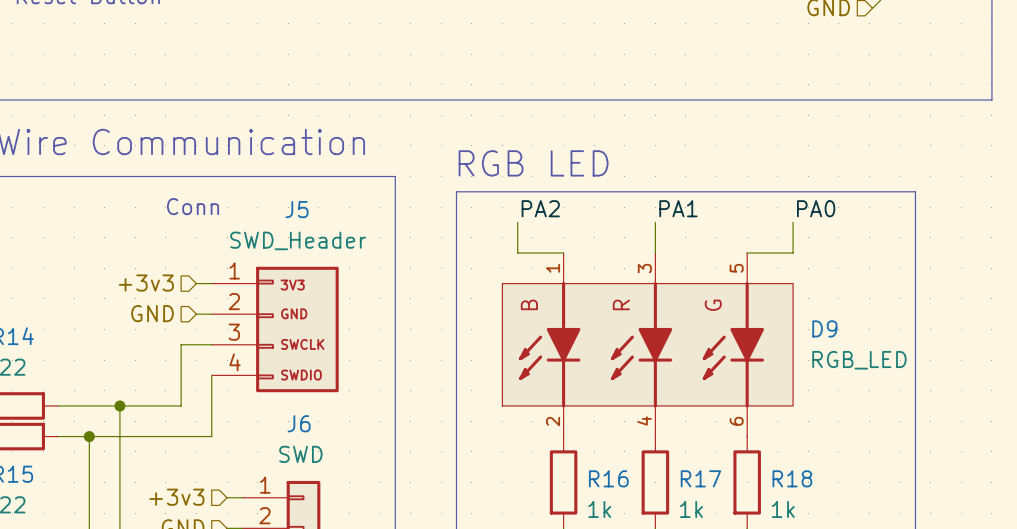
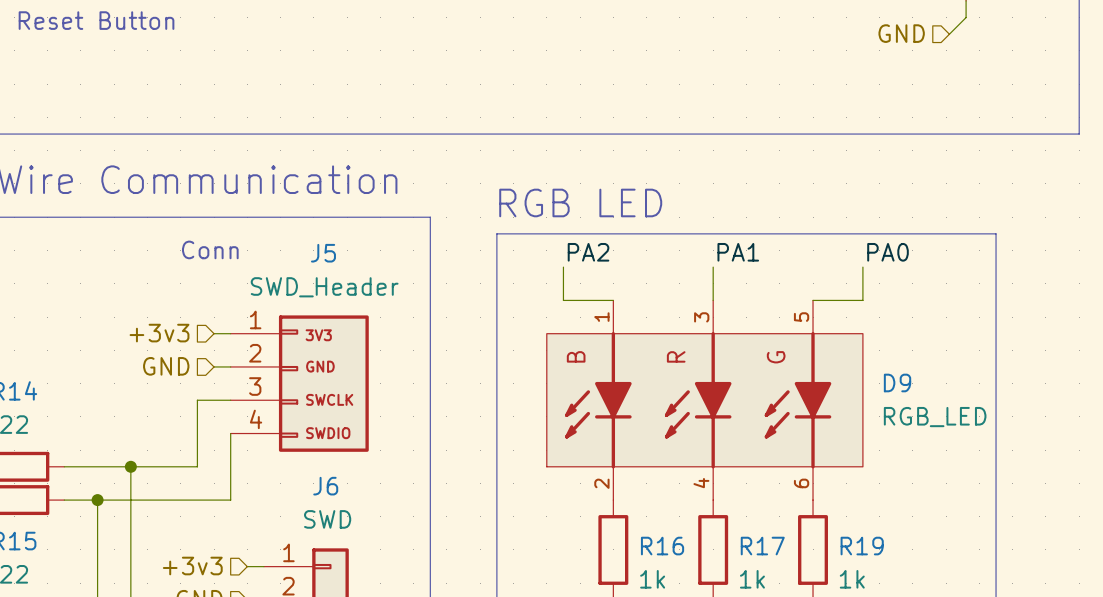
R18 name: R18 (792, 478) -> R19 (862, 546)

